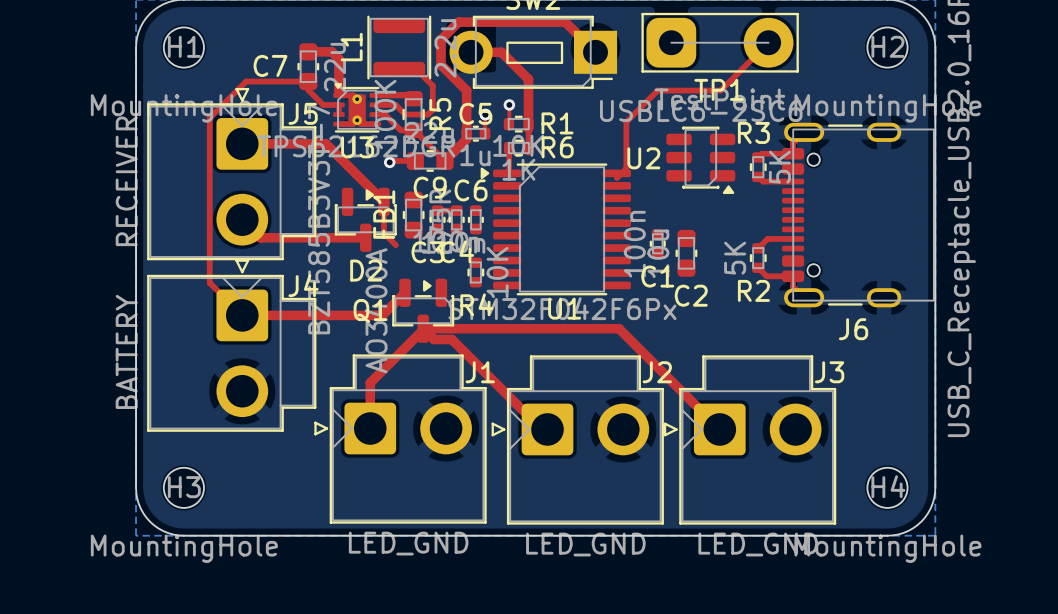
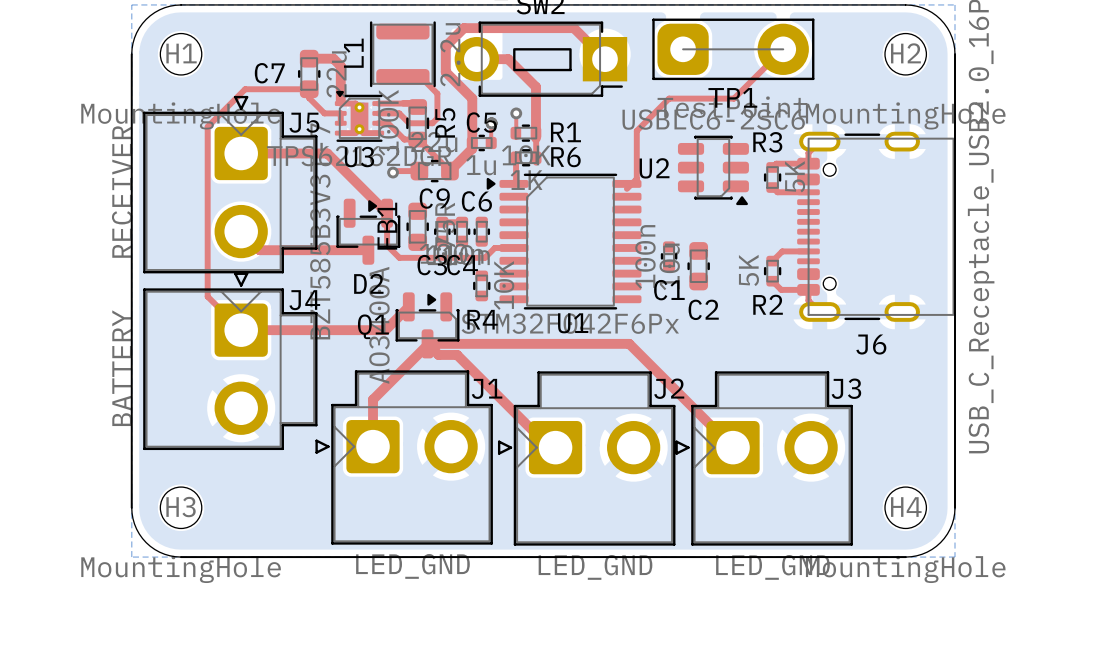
top track: none -> (514, 247) (494, 247) (484, 257) (399, 257)

